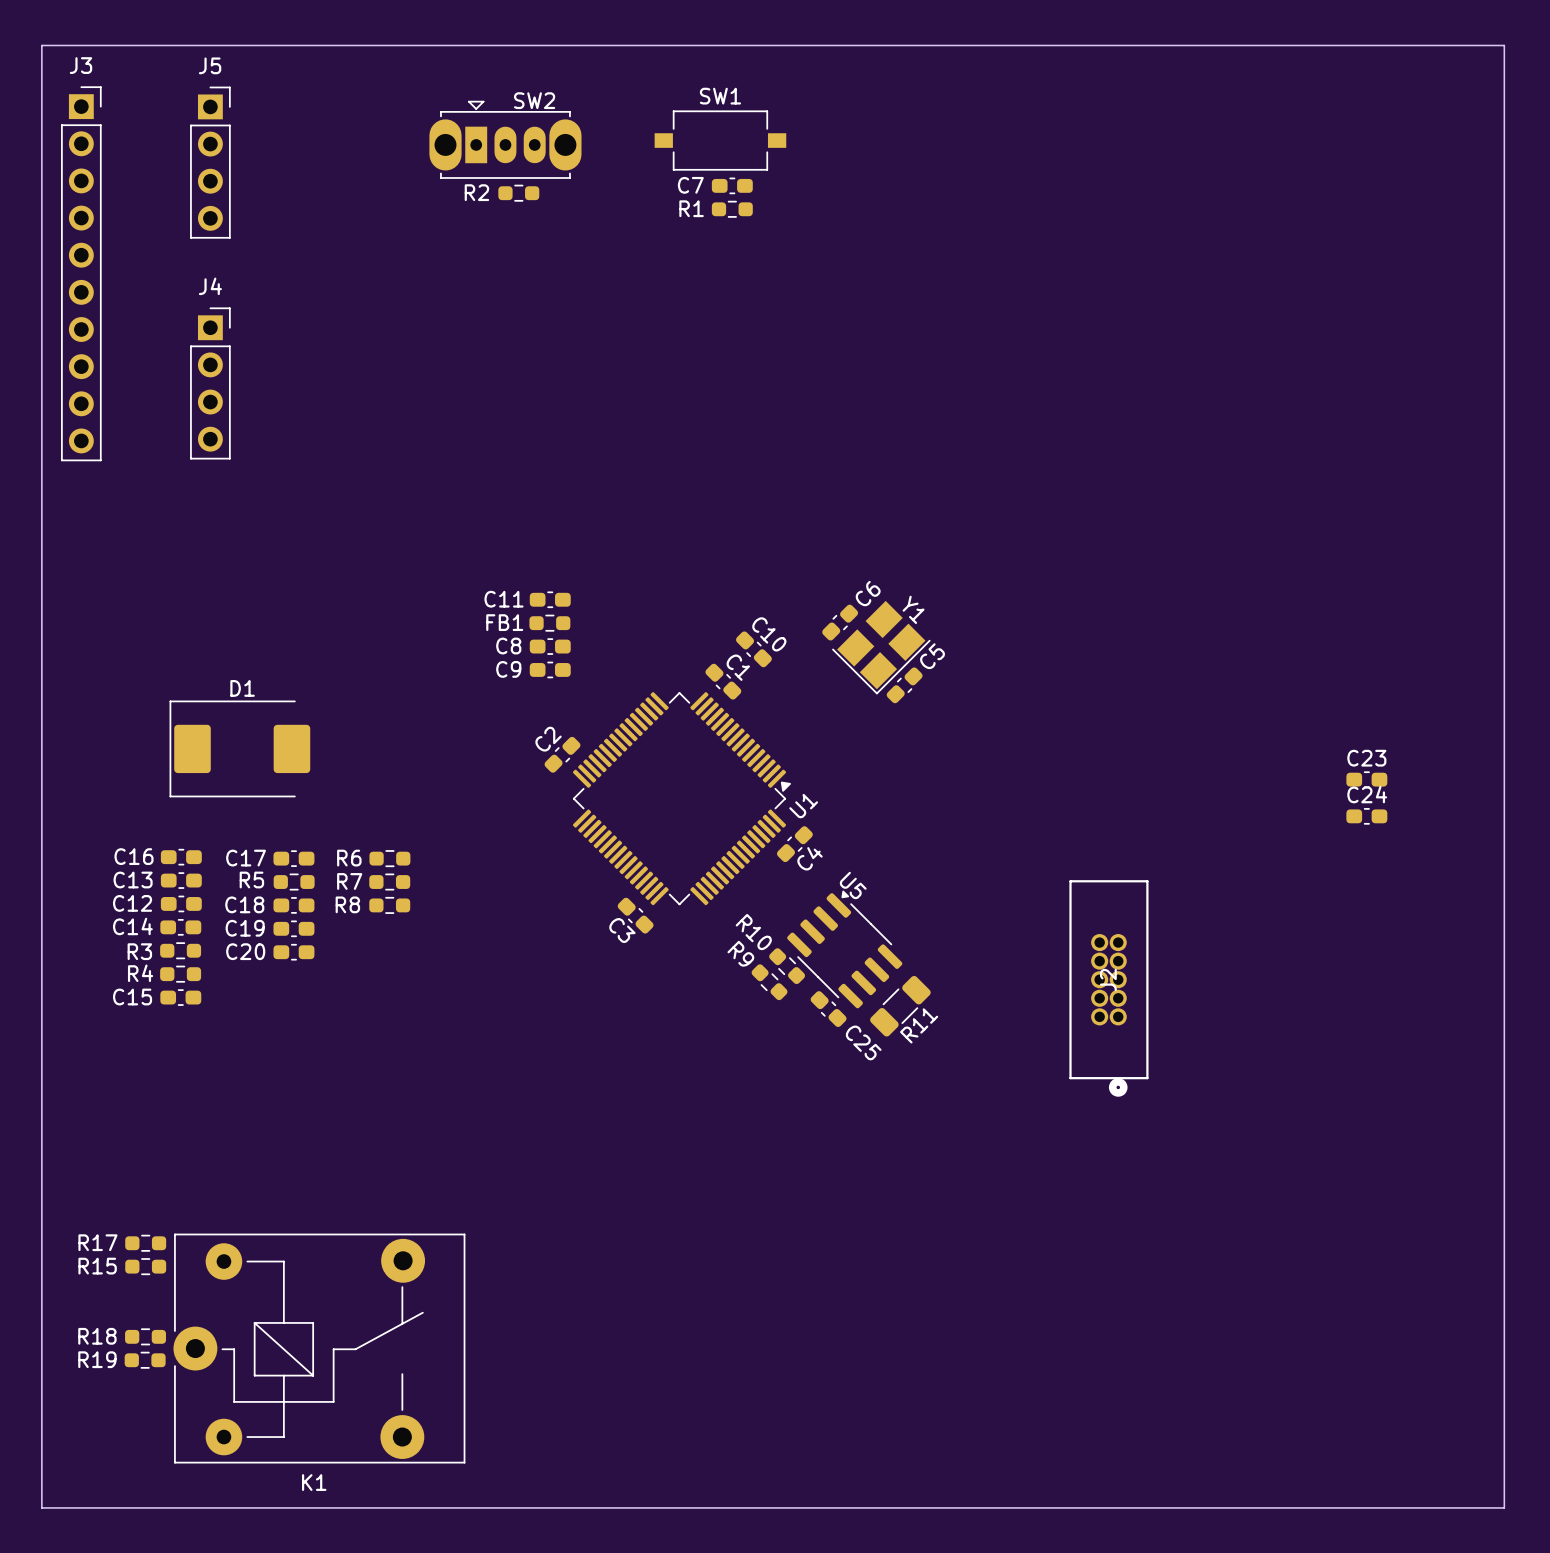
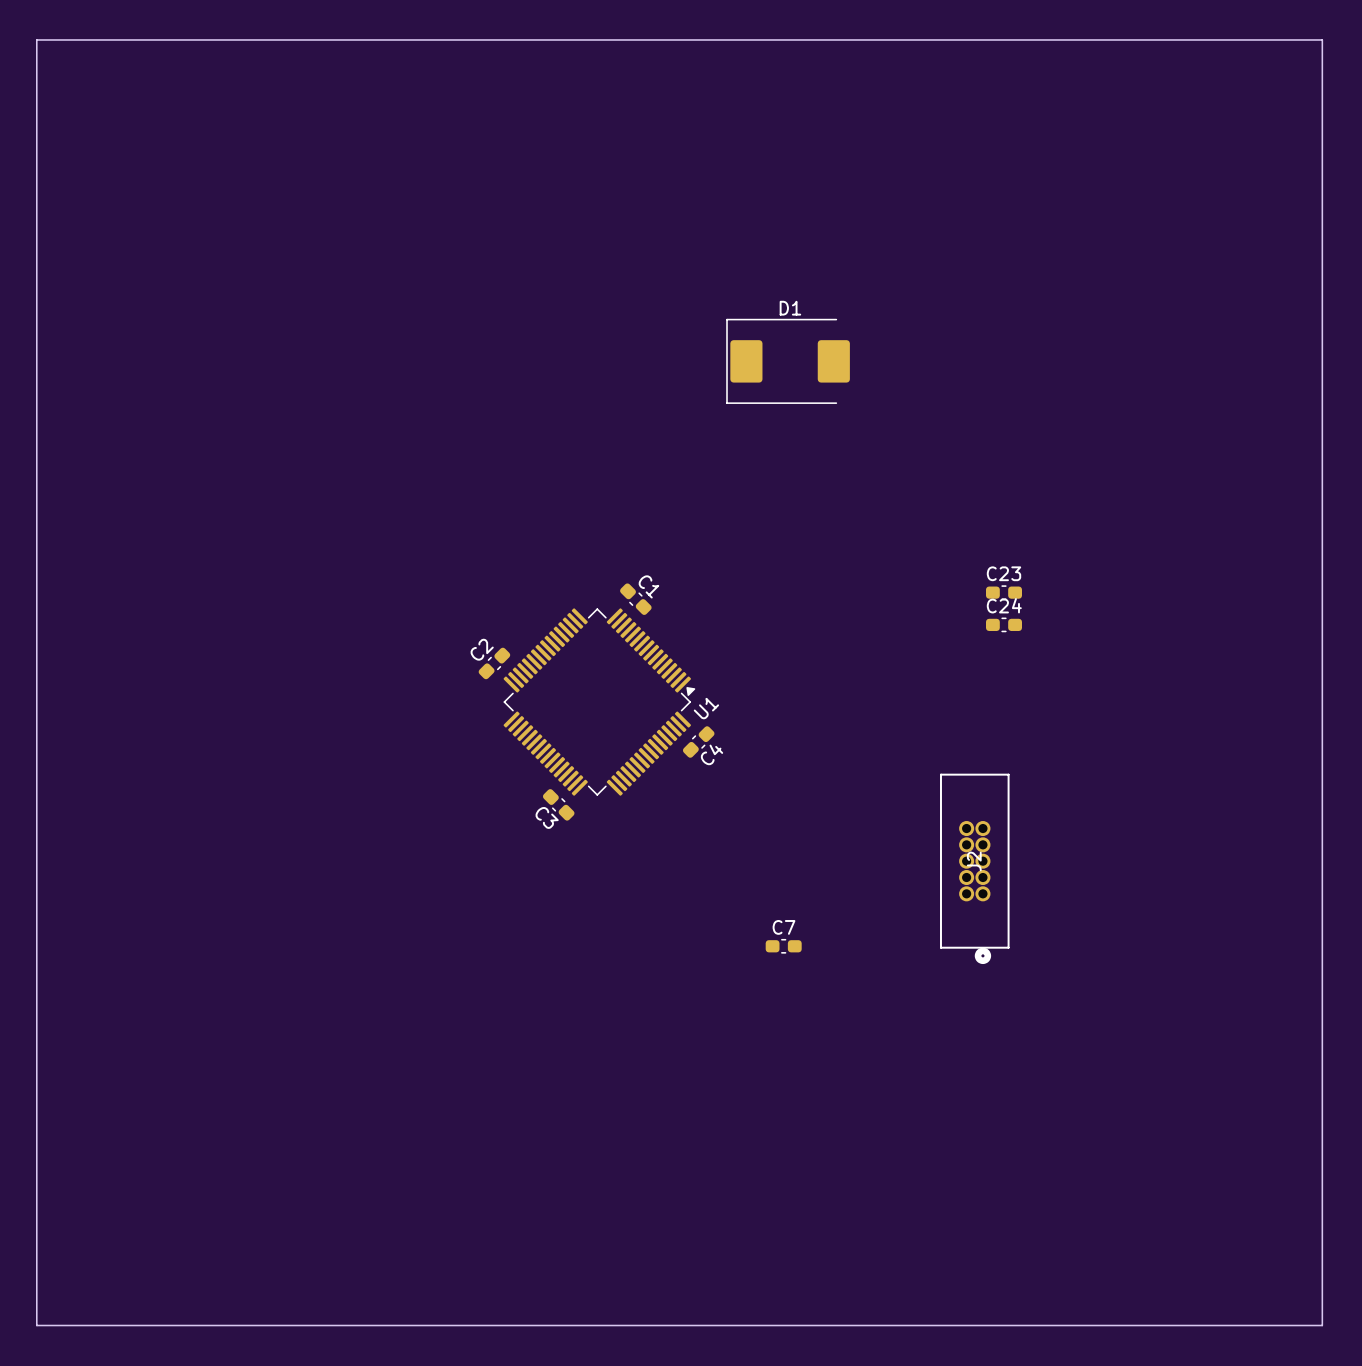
SW2: (505, 139) -> none
SW1: (720, 140) -> none
J5: (210, 162) -> none
C7 name position: C7 (690, 185) -> C7 (783, 927)
C7 position: (732, 185) -> (783, 946)
R2: (518, 193) -> none
R1: (732, 209) -> none
J3: (81, 273) -> none
J4: (210, 383) -> none
C11: (550, 599) -> none
C6: (840, 622) -> none
FB1: (549, 623) -> none
C8: (550, 646) -> none
Y1: (881, 647) -> none
C10: (753, 649) -> none
C9: (550, 669) -> none
C5: (904, 685) -> none
D1 position: (239, 748) -> (788, 361)
C23 position: (1366, 779) -> (1003, 592)
C24 position: (1366, 816) -> (1003, 624)
C16: (181, 857) -> none
C17: (293, 858) -> none
R6: (389, 858) -> none
C13: (181, 880) -> none
R5: (294, 882) -> none
R7: (389, 882) -> none
C12: (181, 903) -> none
C18: (293, 905) -> none
R8: (389, 905) -> none
C14: (180, 927) -> none
C19: (293, 928) -> none
U5: (844, 949) -> none
R3: (180, 950) -> none
C20: (293, 952) -> none
R10: (787, 966) -> none
R4: (180, 974) -> none
R9: (769, 982) -> none
C15: (180, 997) -> none
R11: (900, 1006) -> none
C25: (828, 1009) -> none
R17: (145, 1243) -> none
R15: (145, 1266) -> none
R18: (145, 1336) -> none
K1: (319, 1348) -> none
R19: (145, 1360) -> none

